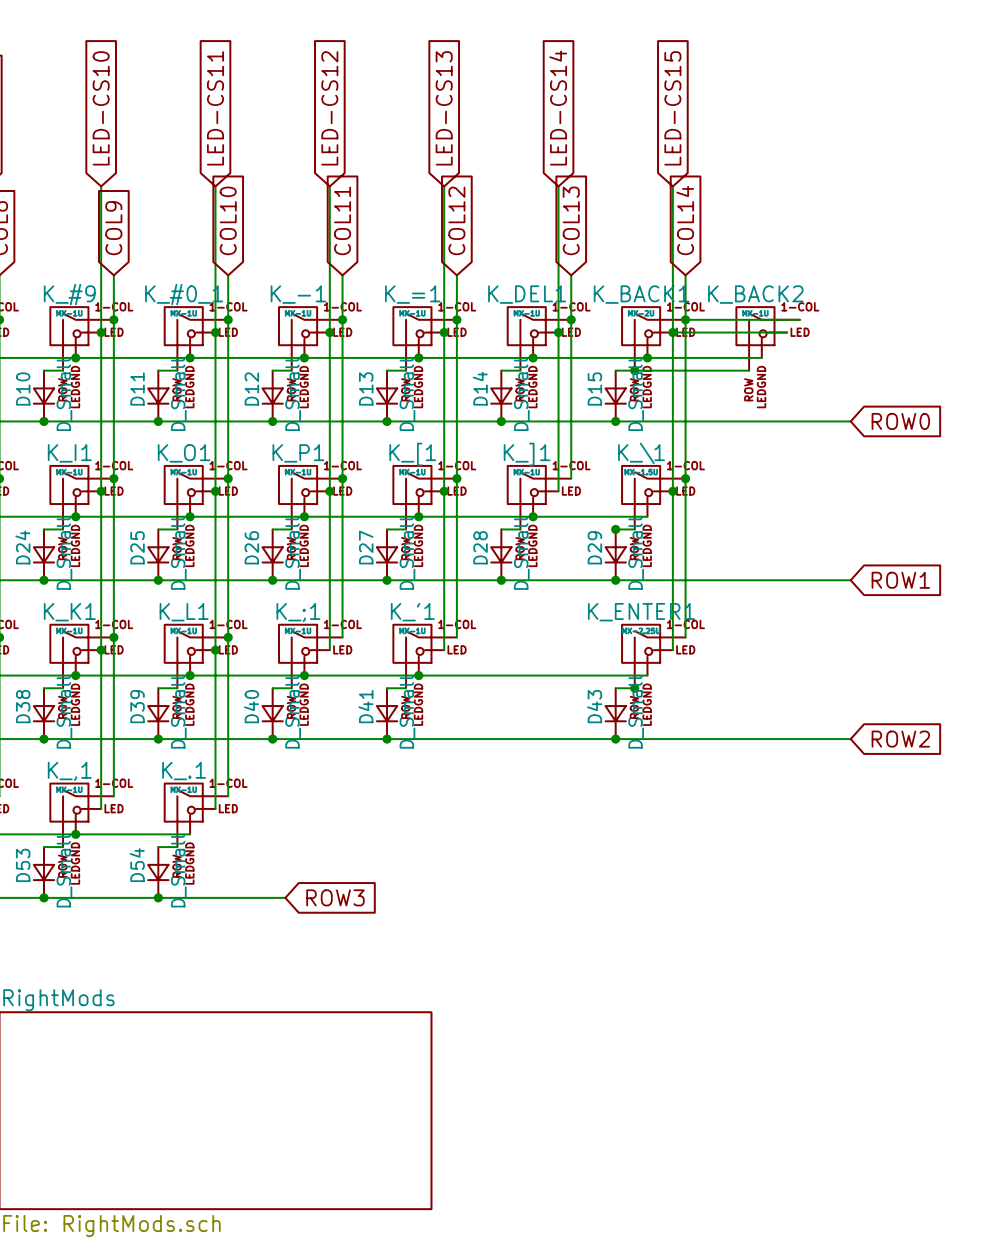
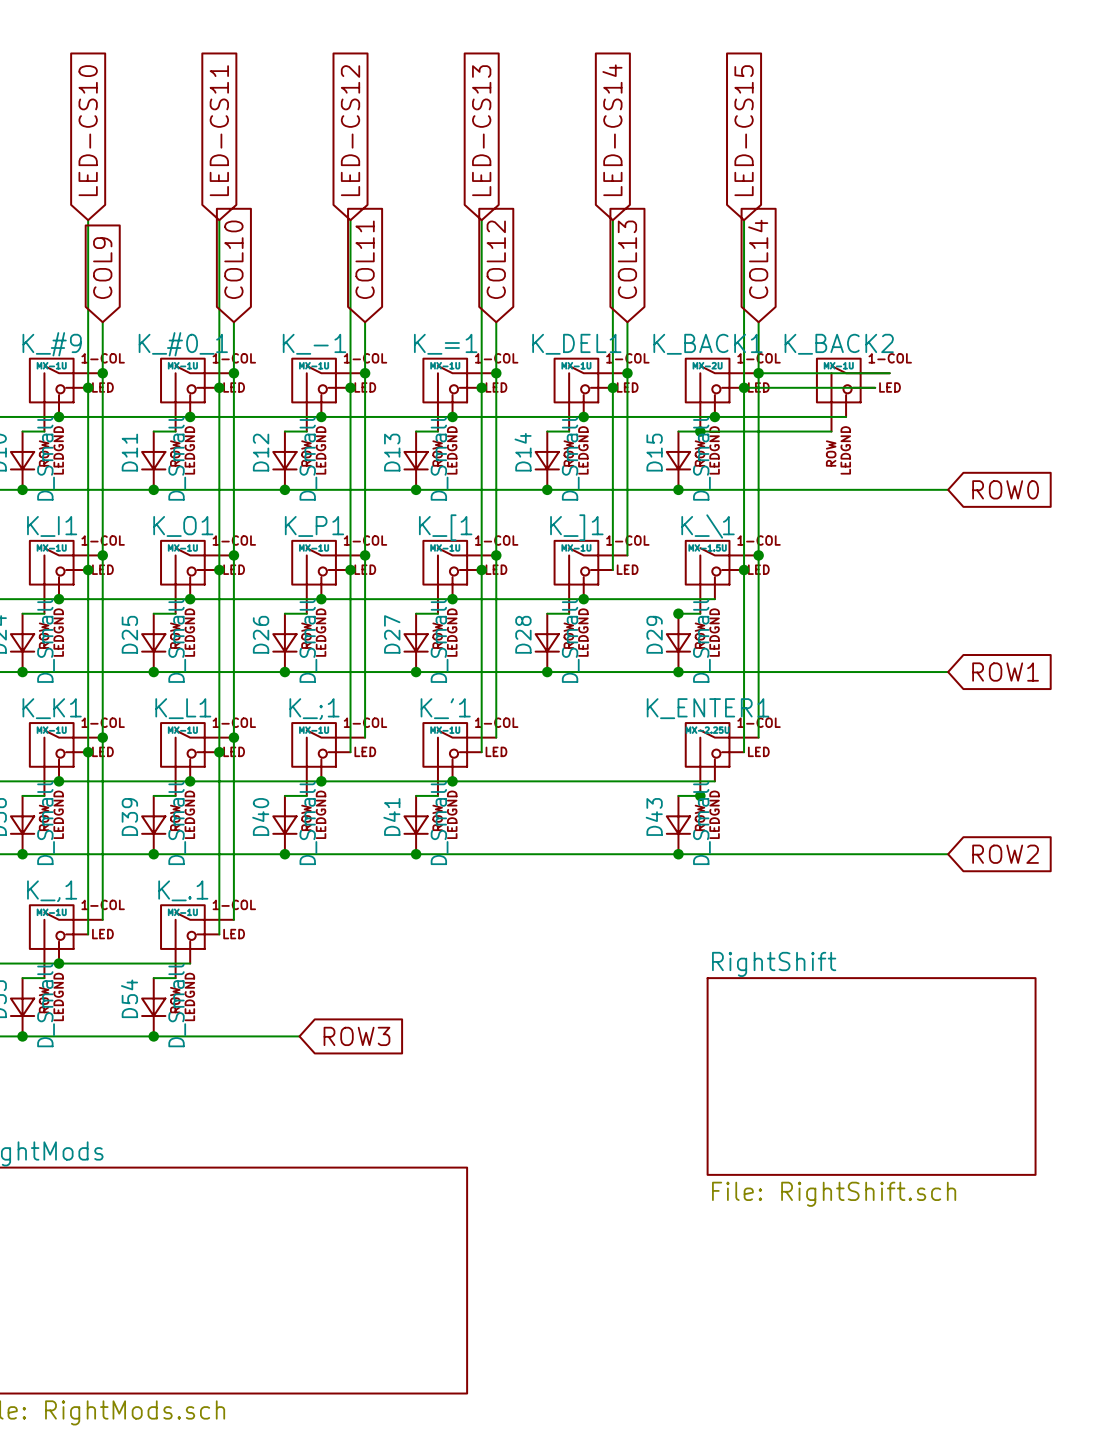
sheet RightShift: none -> File: RightShift.sch (871, 1076)

